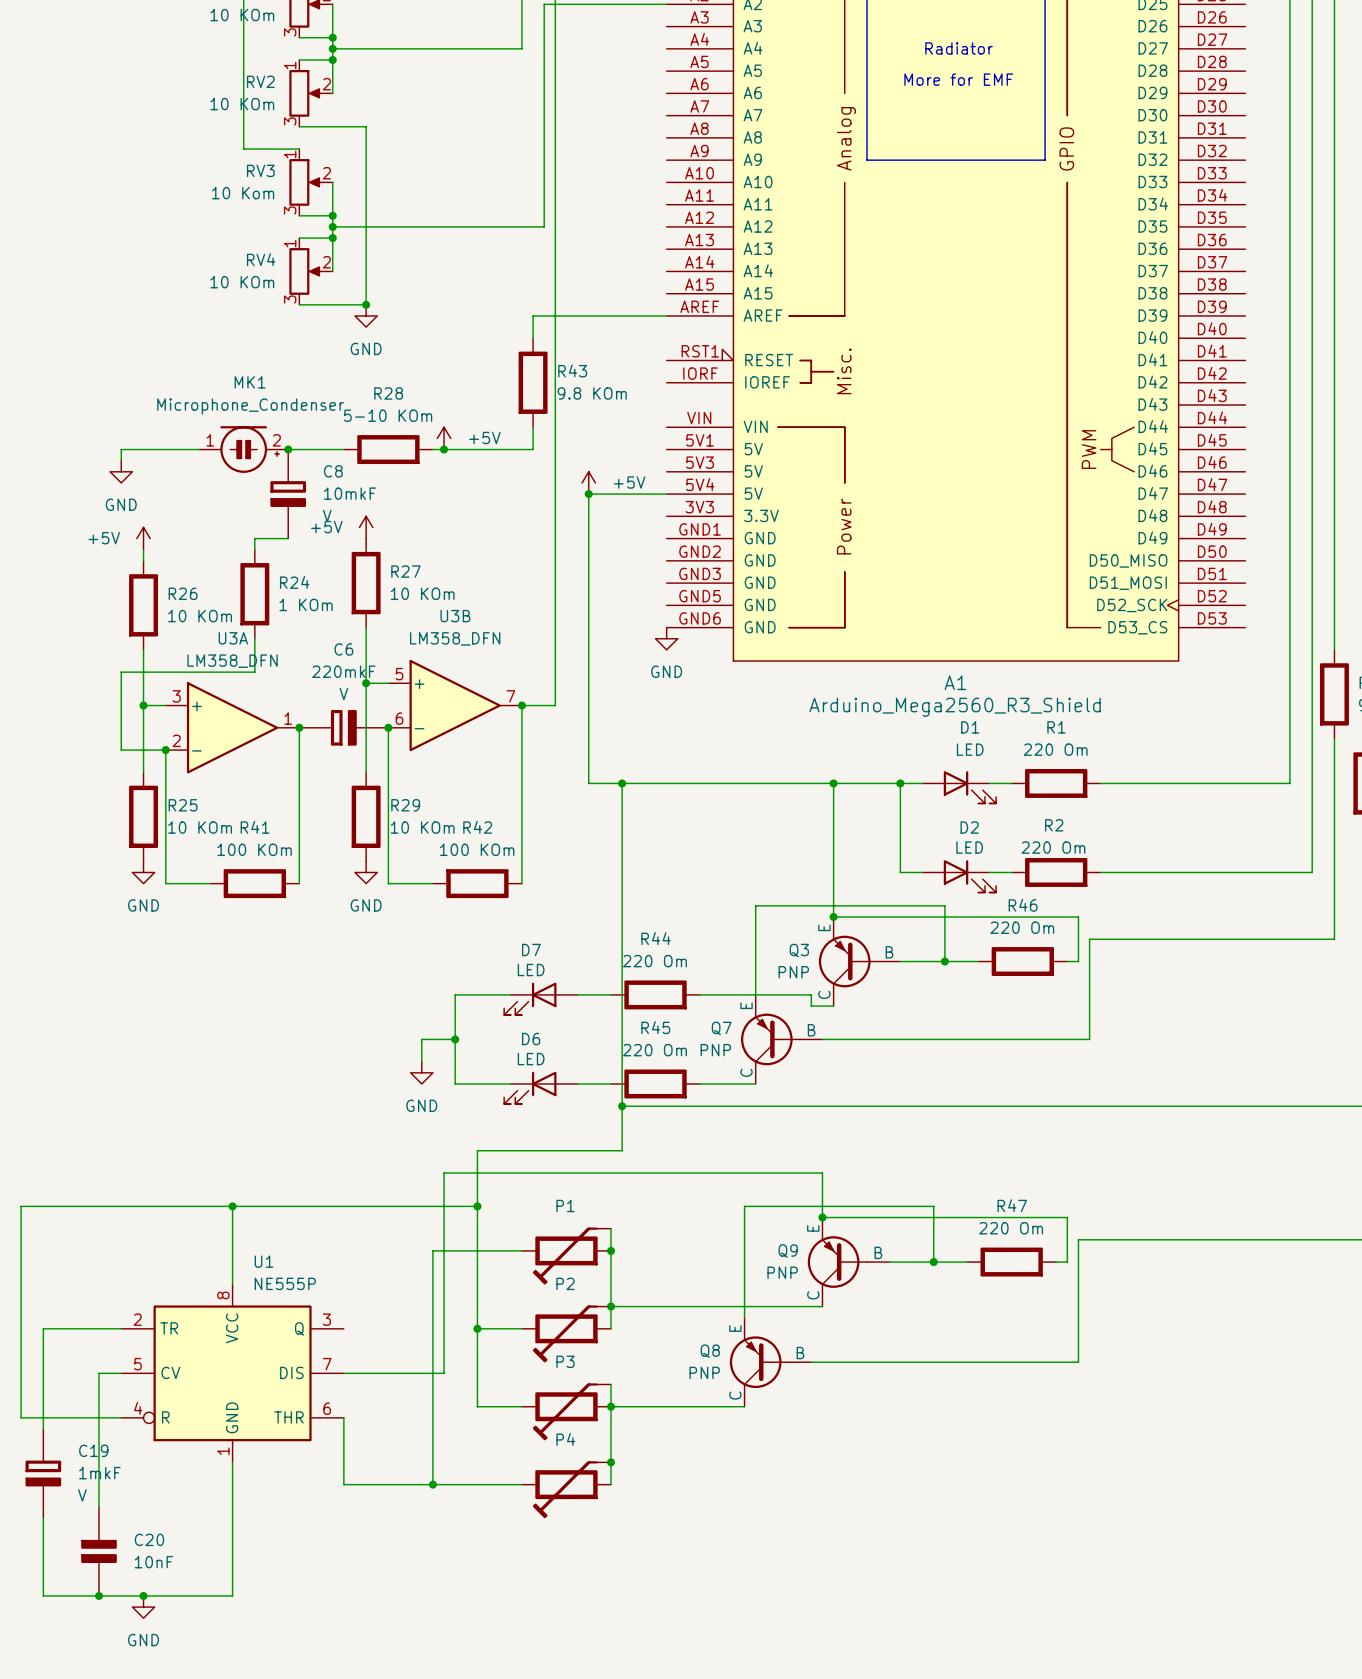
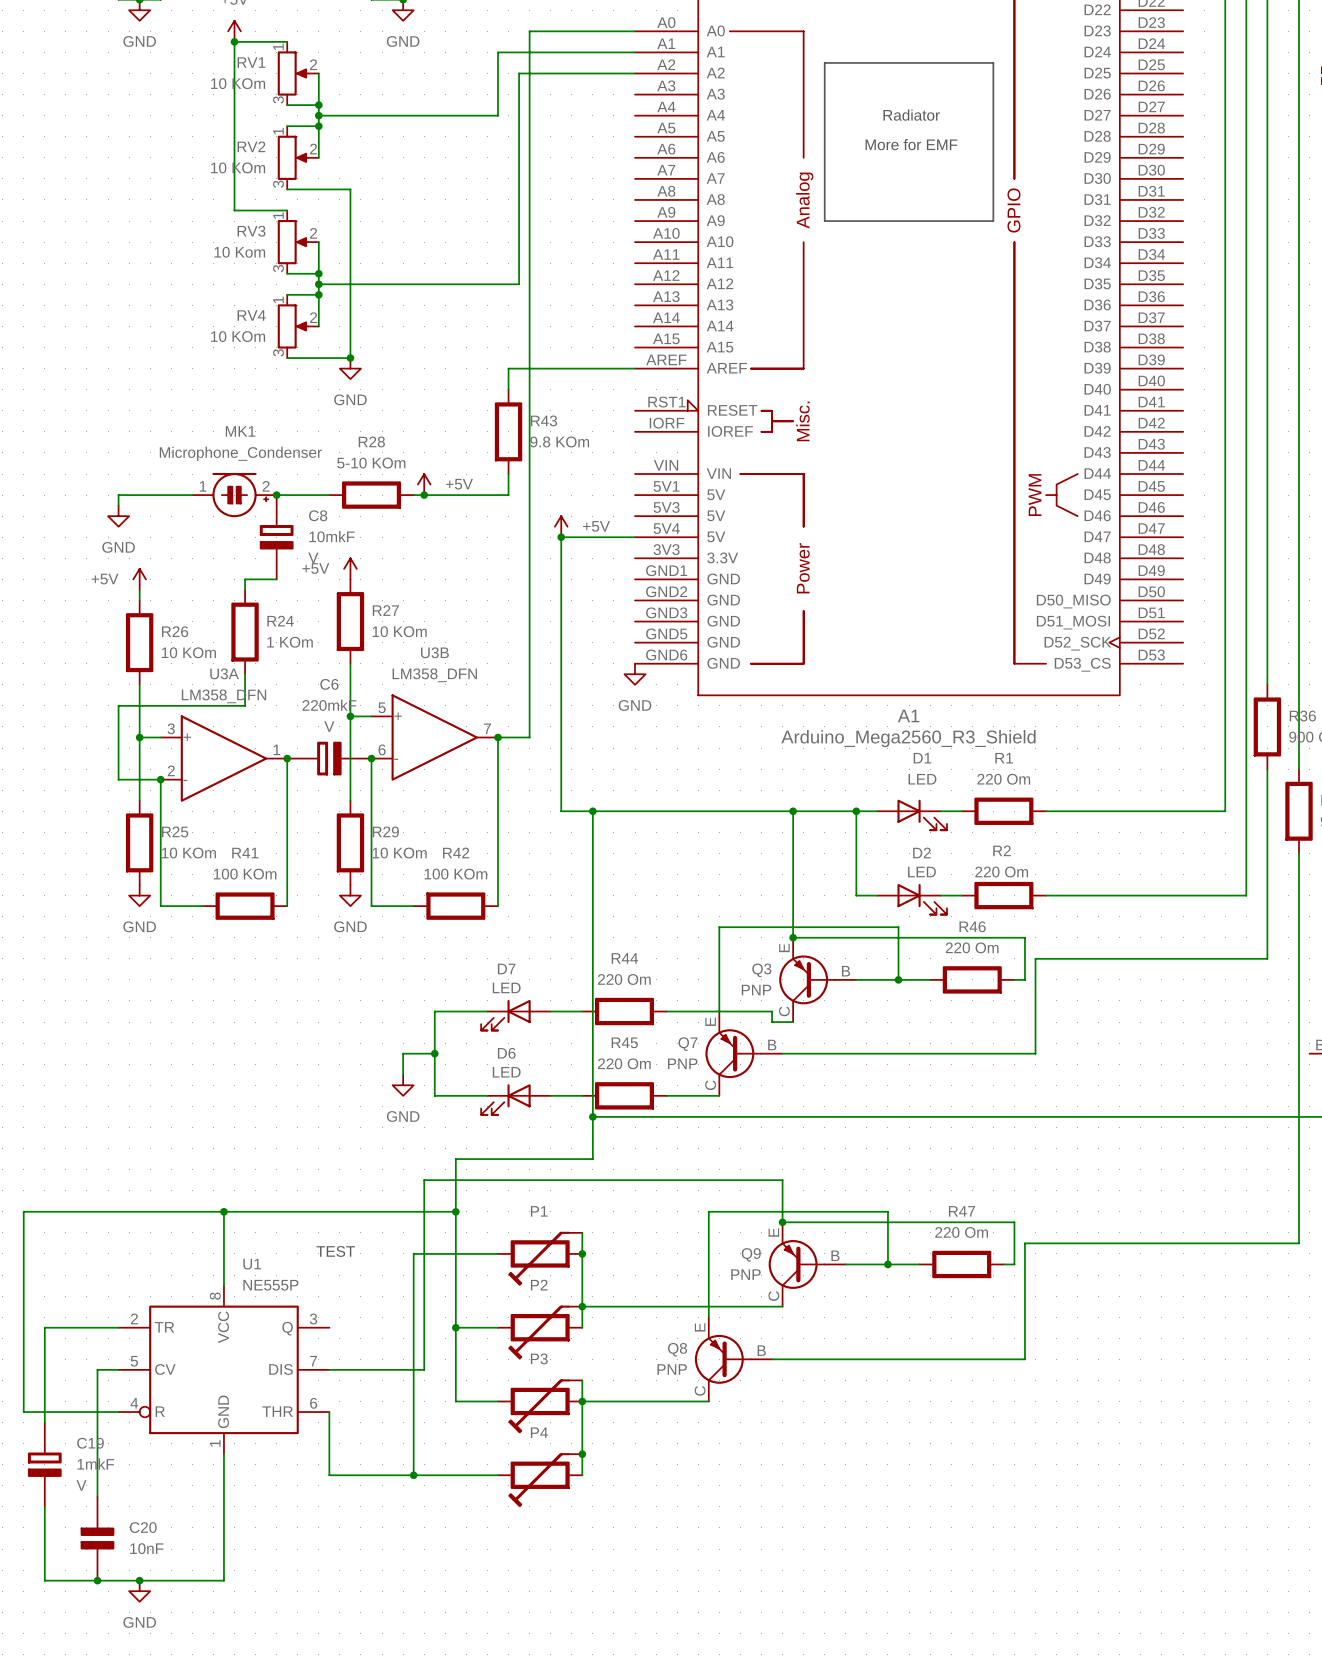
text: none -> TEST (335, 1251)

